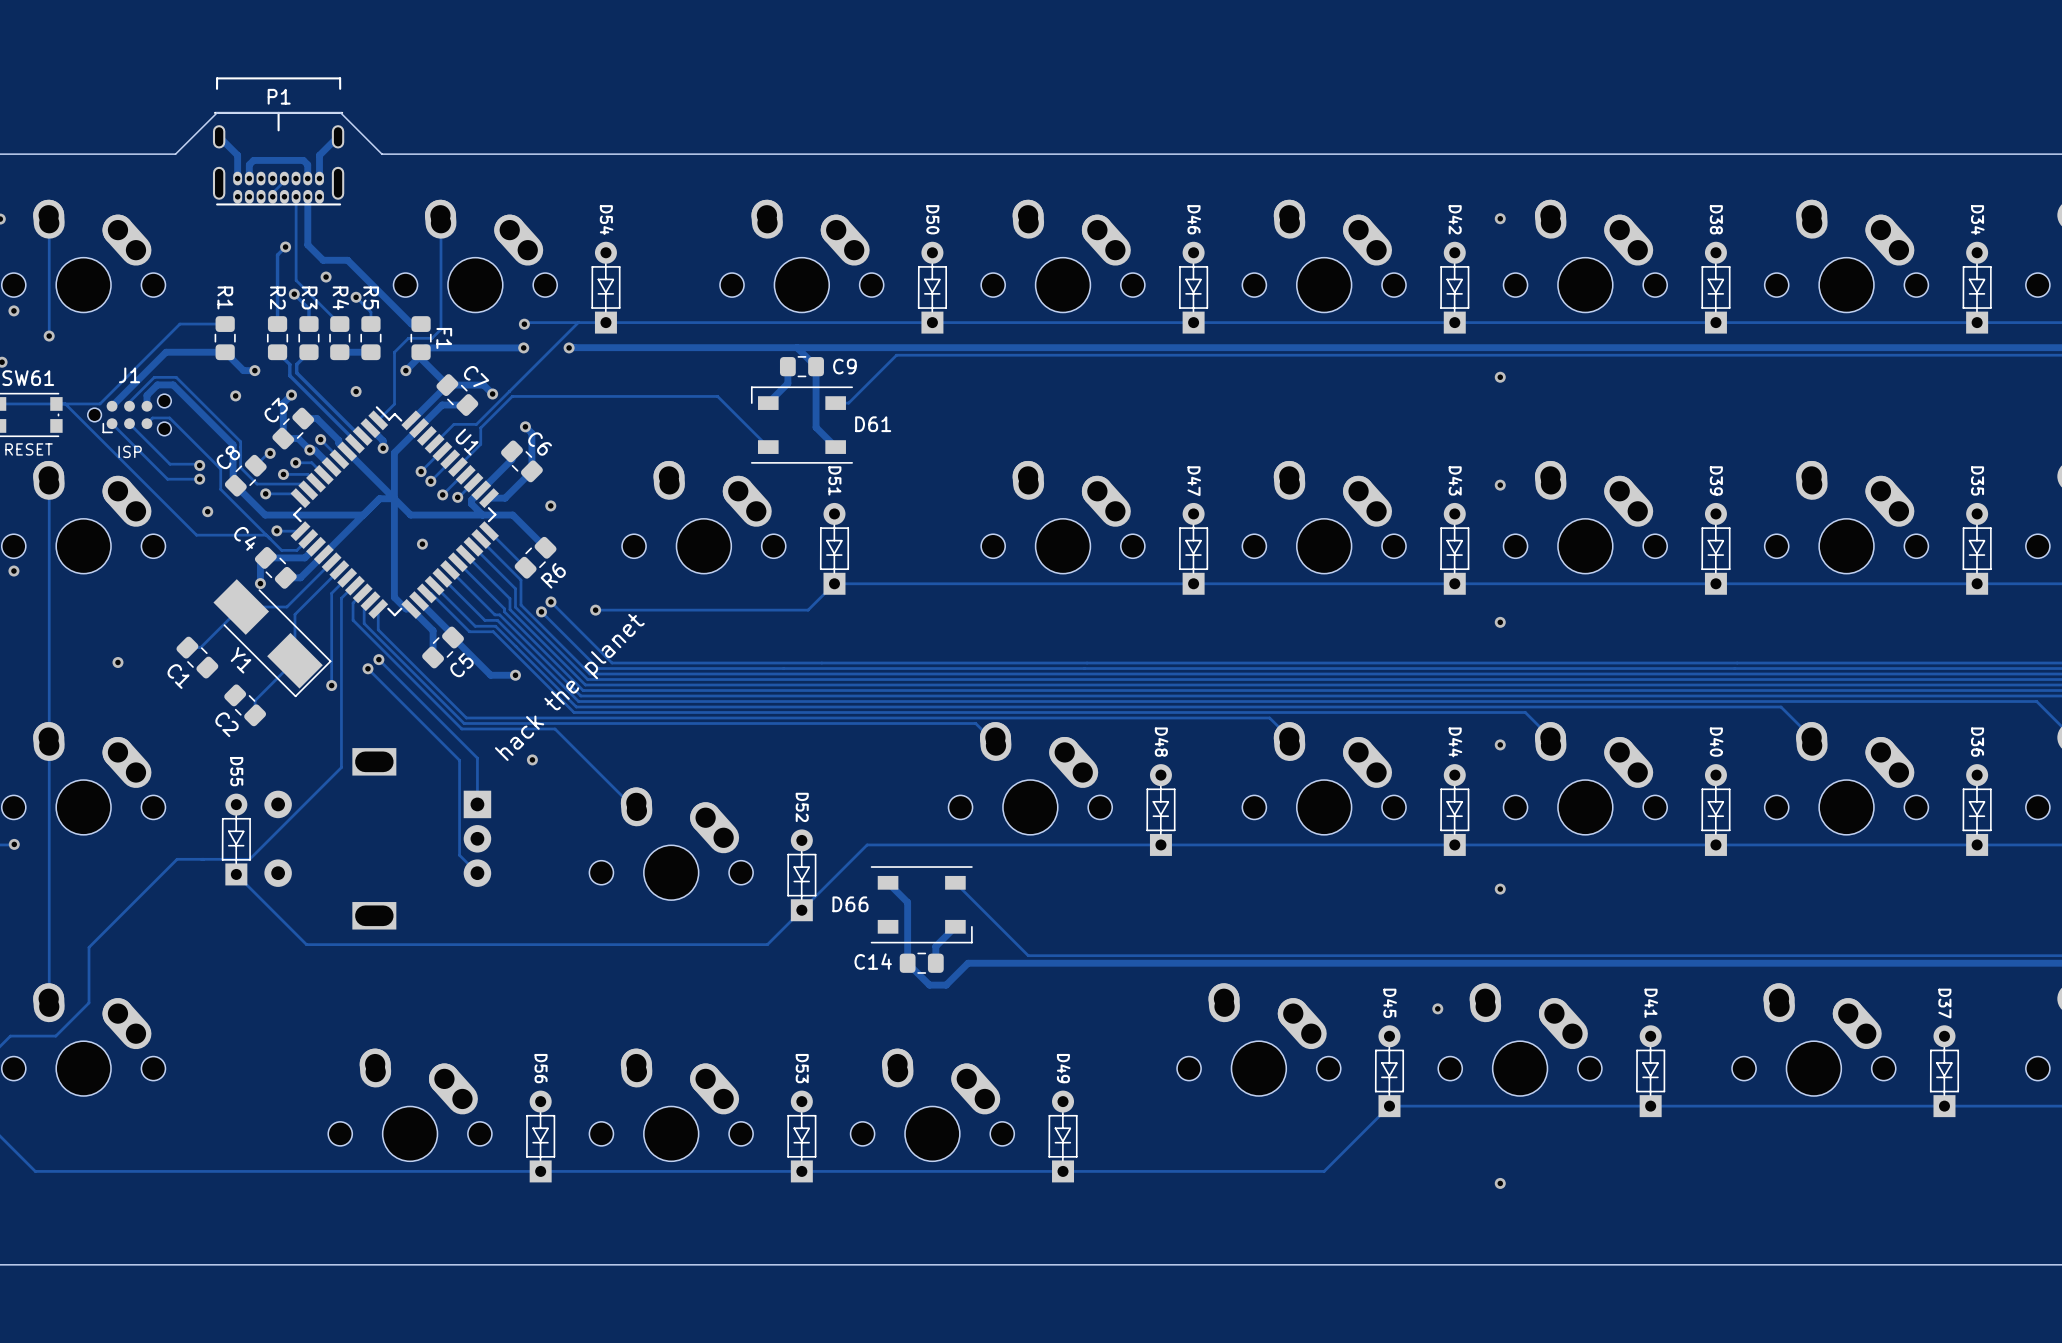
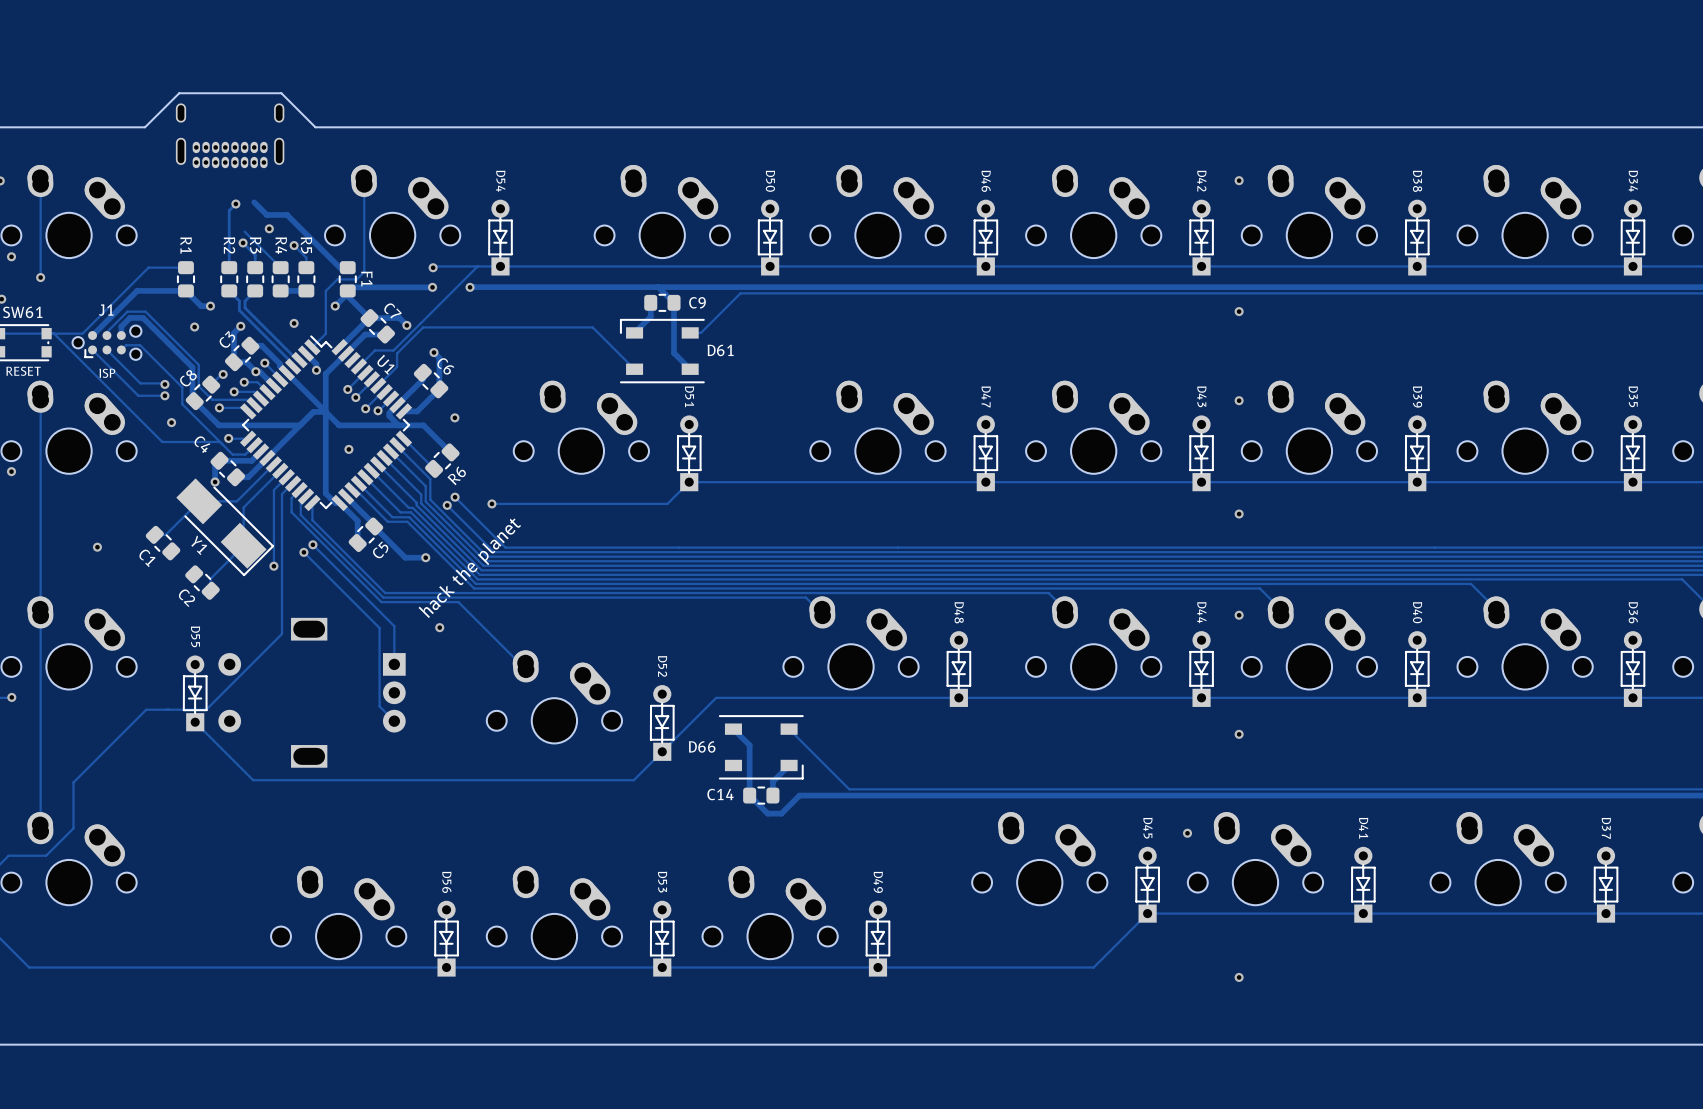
track: (219, 136) (237, 155) (237, 178) -> none
track: (338, 136) (319, 155) (319, 178) -> none
P1 side: bottom (278, 141) -> top (230, 135)
track: (307, 178) (307, 164) (303, 160) (253, 160) (249, 164) (249, 178) -> none
track: (284, 181) (272, 193) -> none
track: (296, 196) (296, 280) -> none
track: (307, 196) (307, 244) -> none

